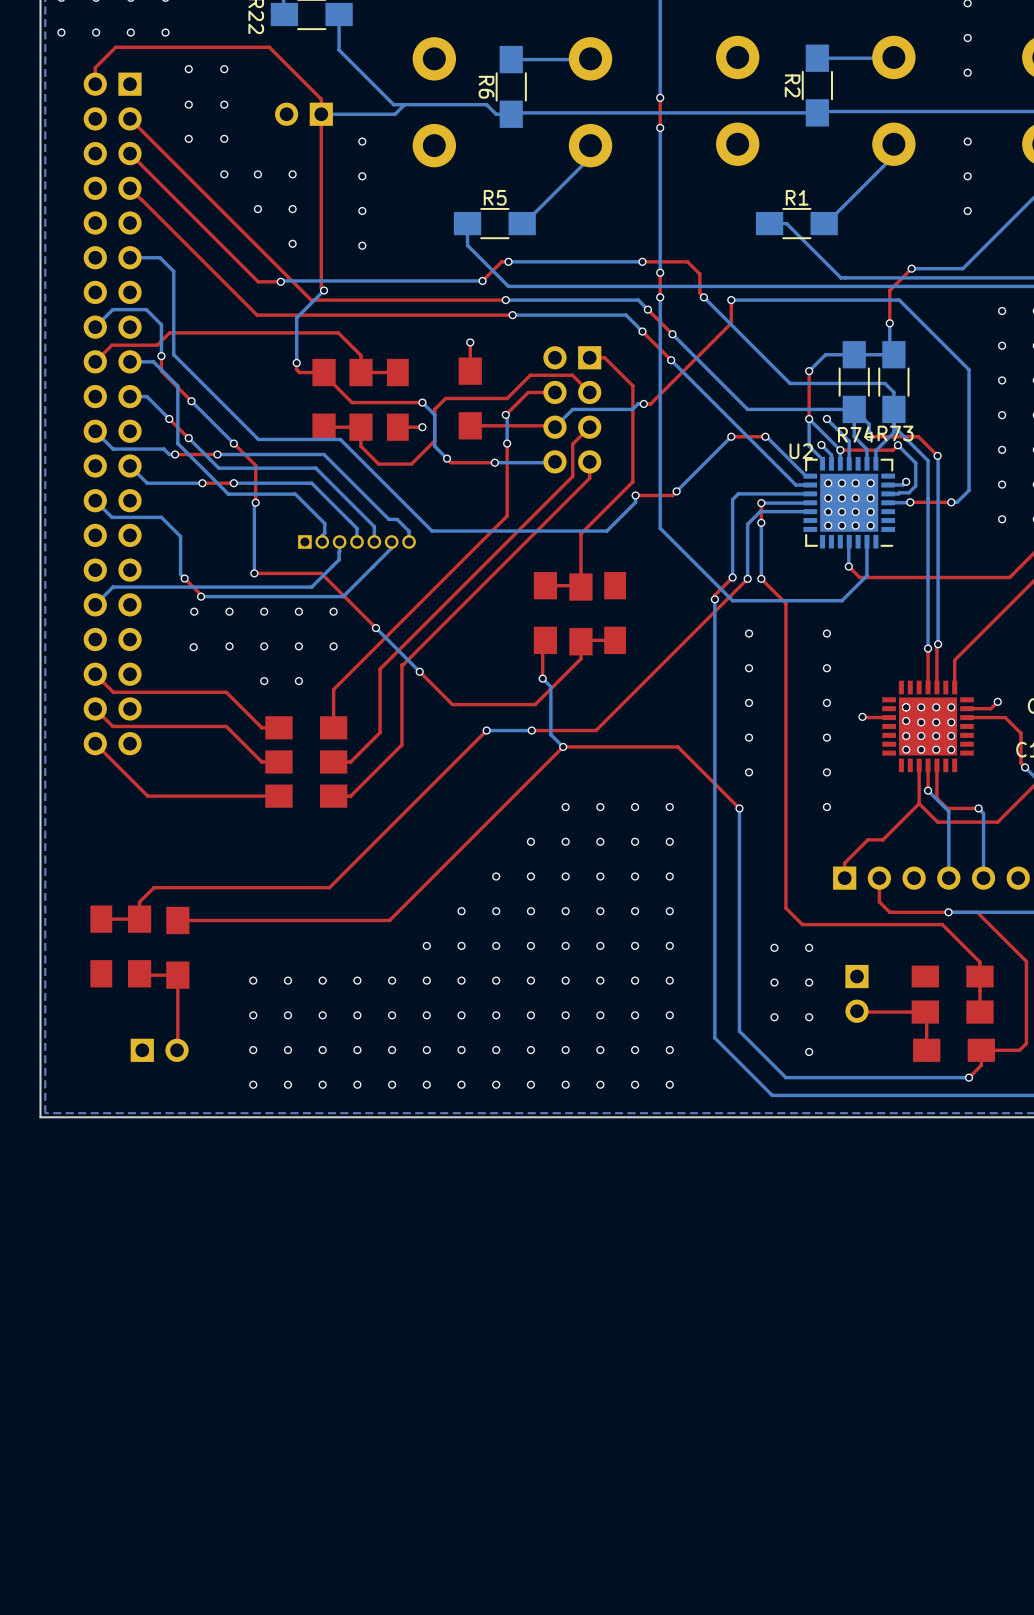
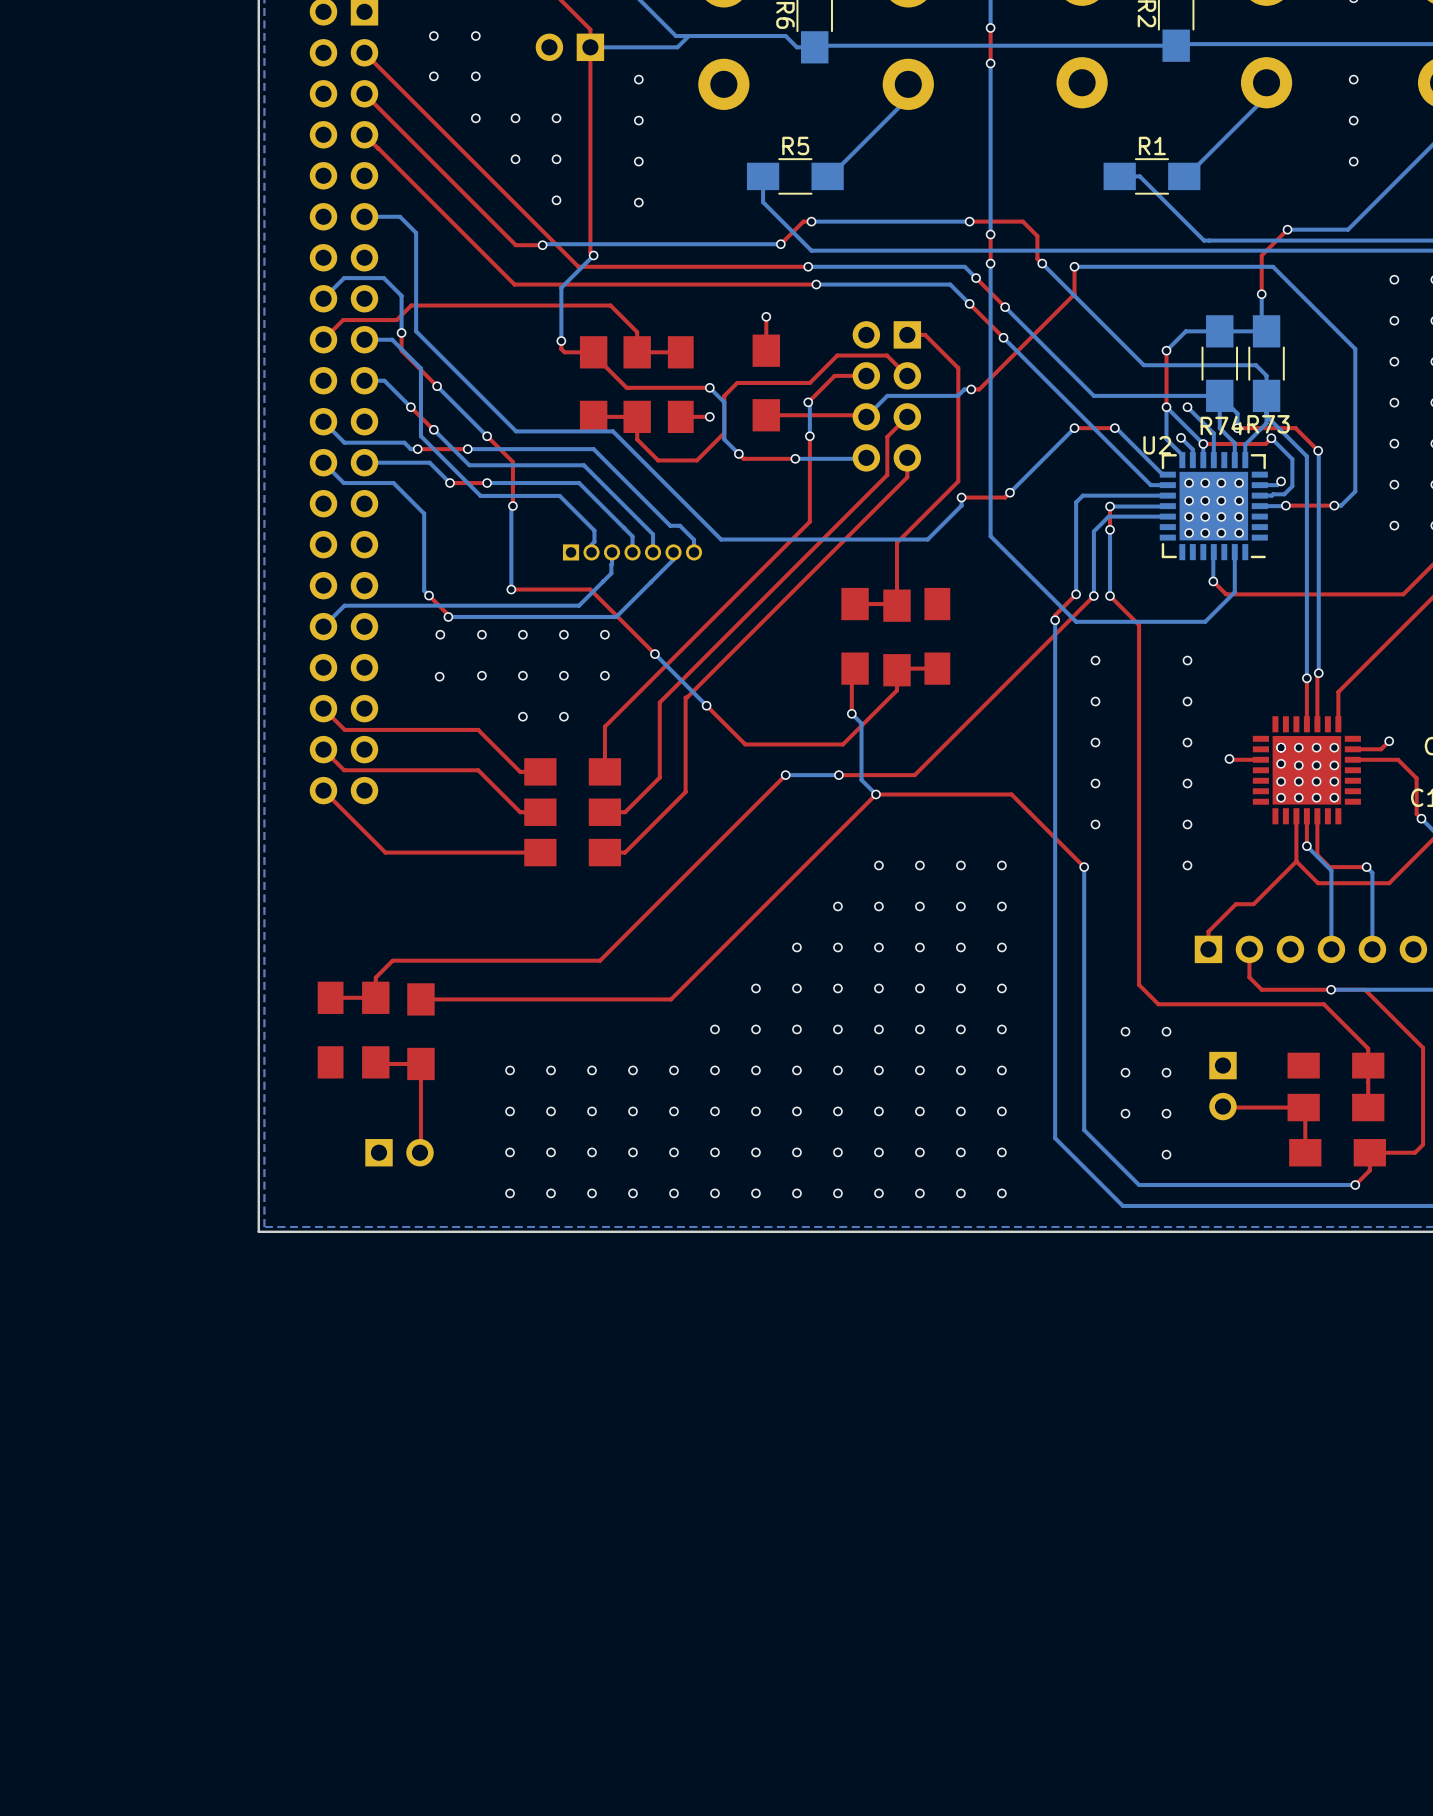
bottom track: (130, 465) (147, 483) -> (323, 462) (343, 483) (384, 483)
bottom track: (202, 483) (154, 483) -> (450, 483) (429, 462) (364, 462)
bottom track: (95, 500) (111, 517) (161, 517) (180, 536) -> (393, 483) (424, 513) (424, 545)

